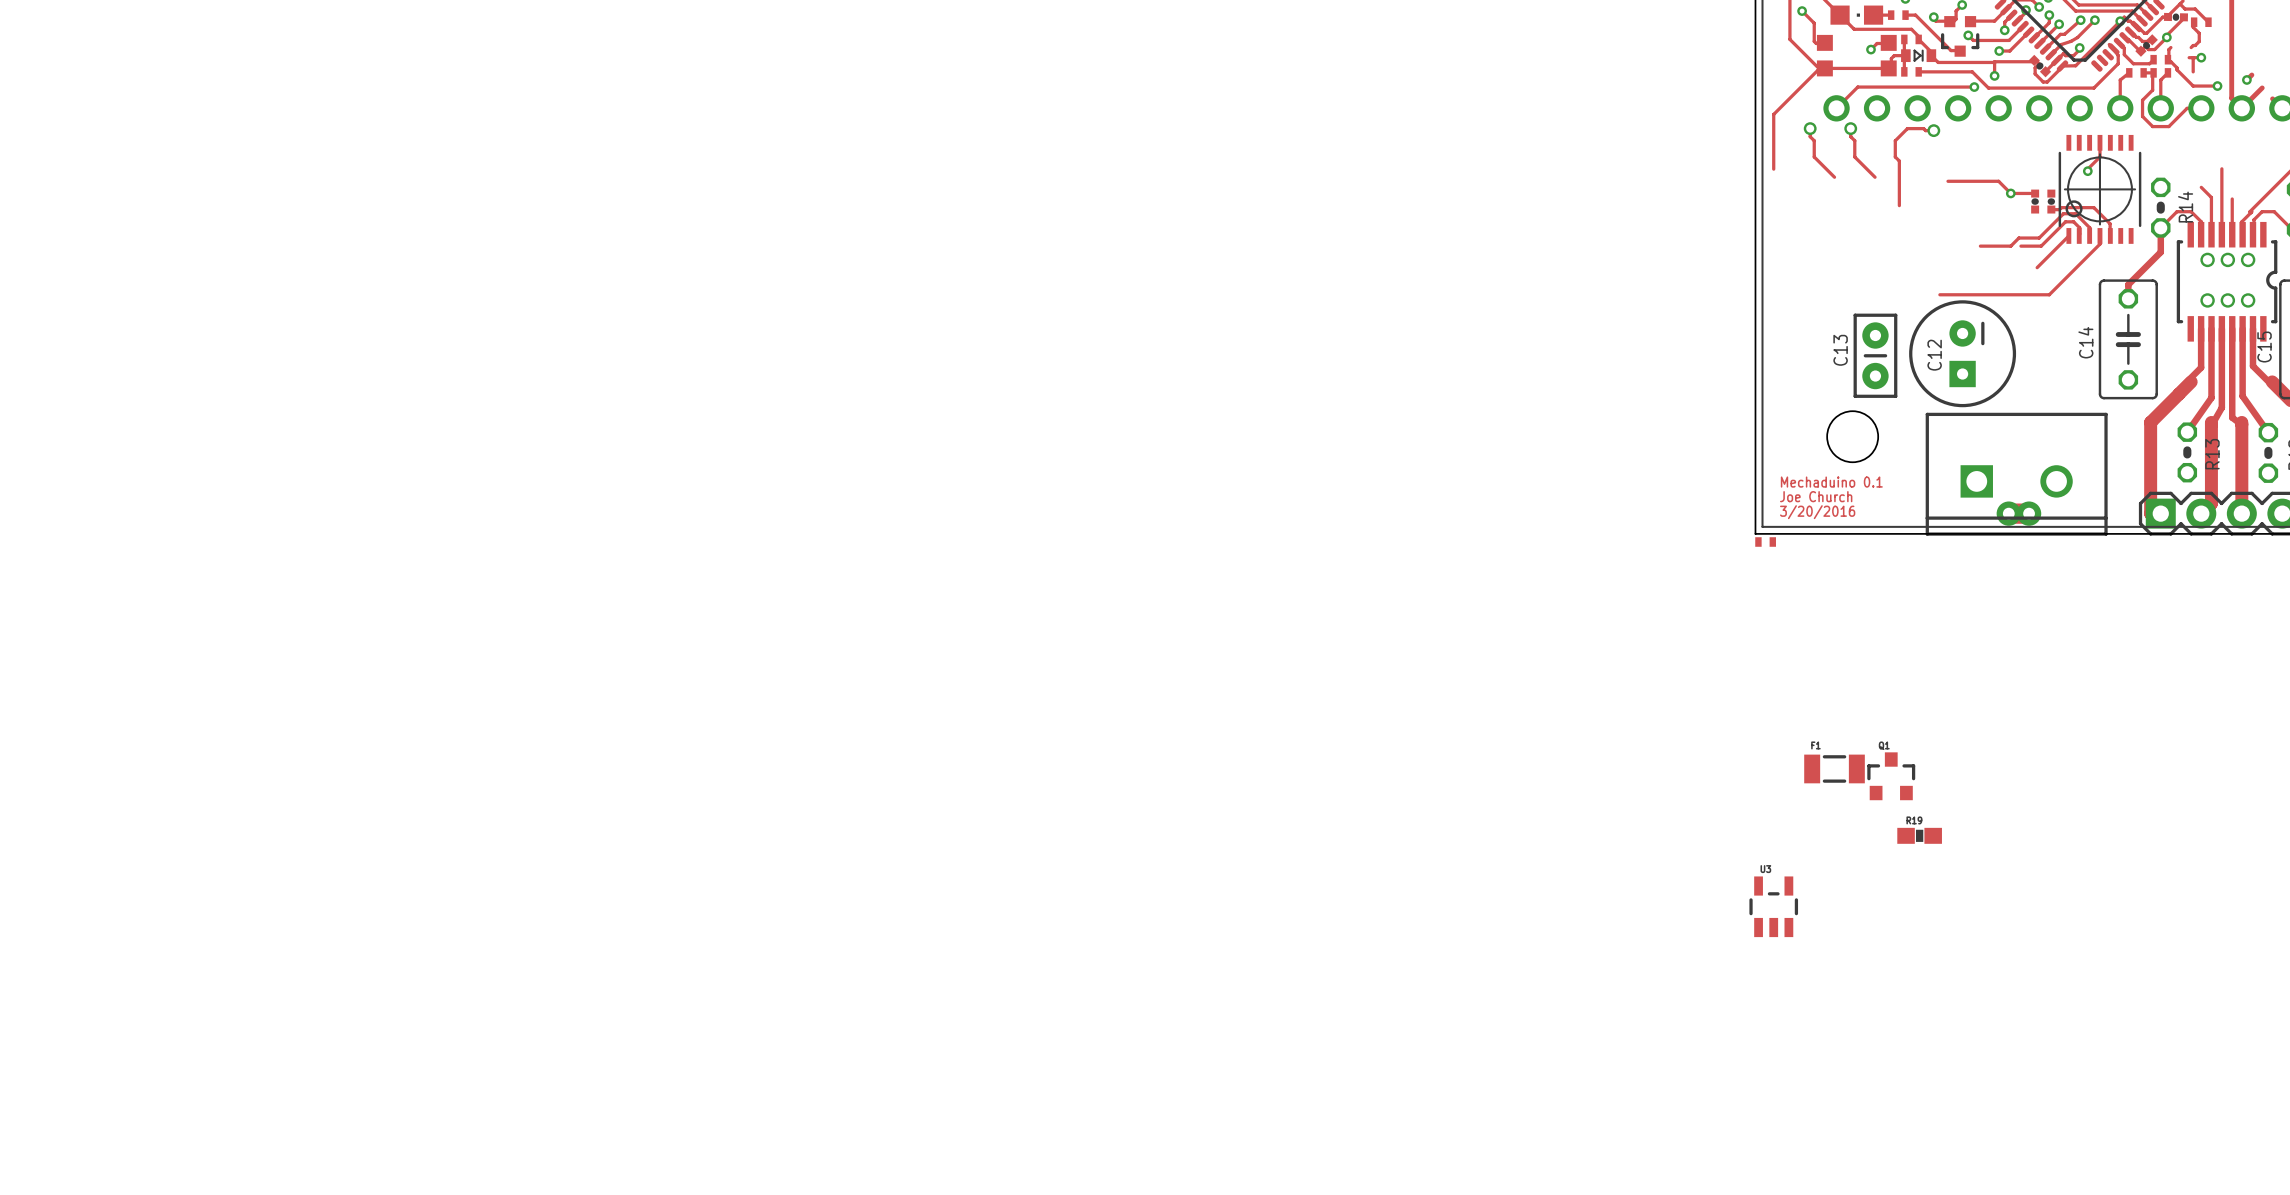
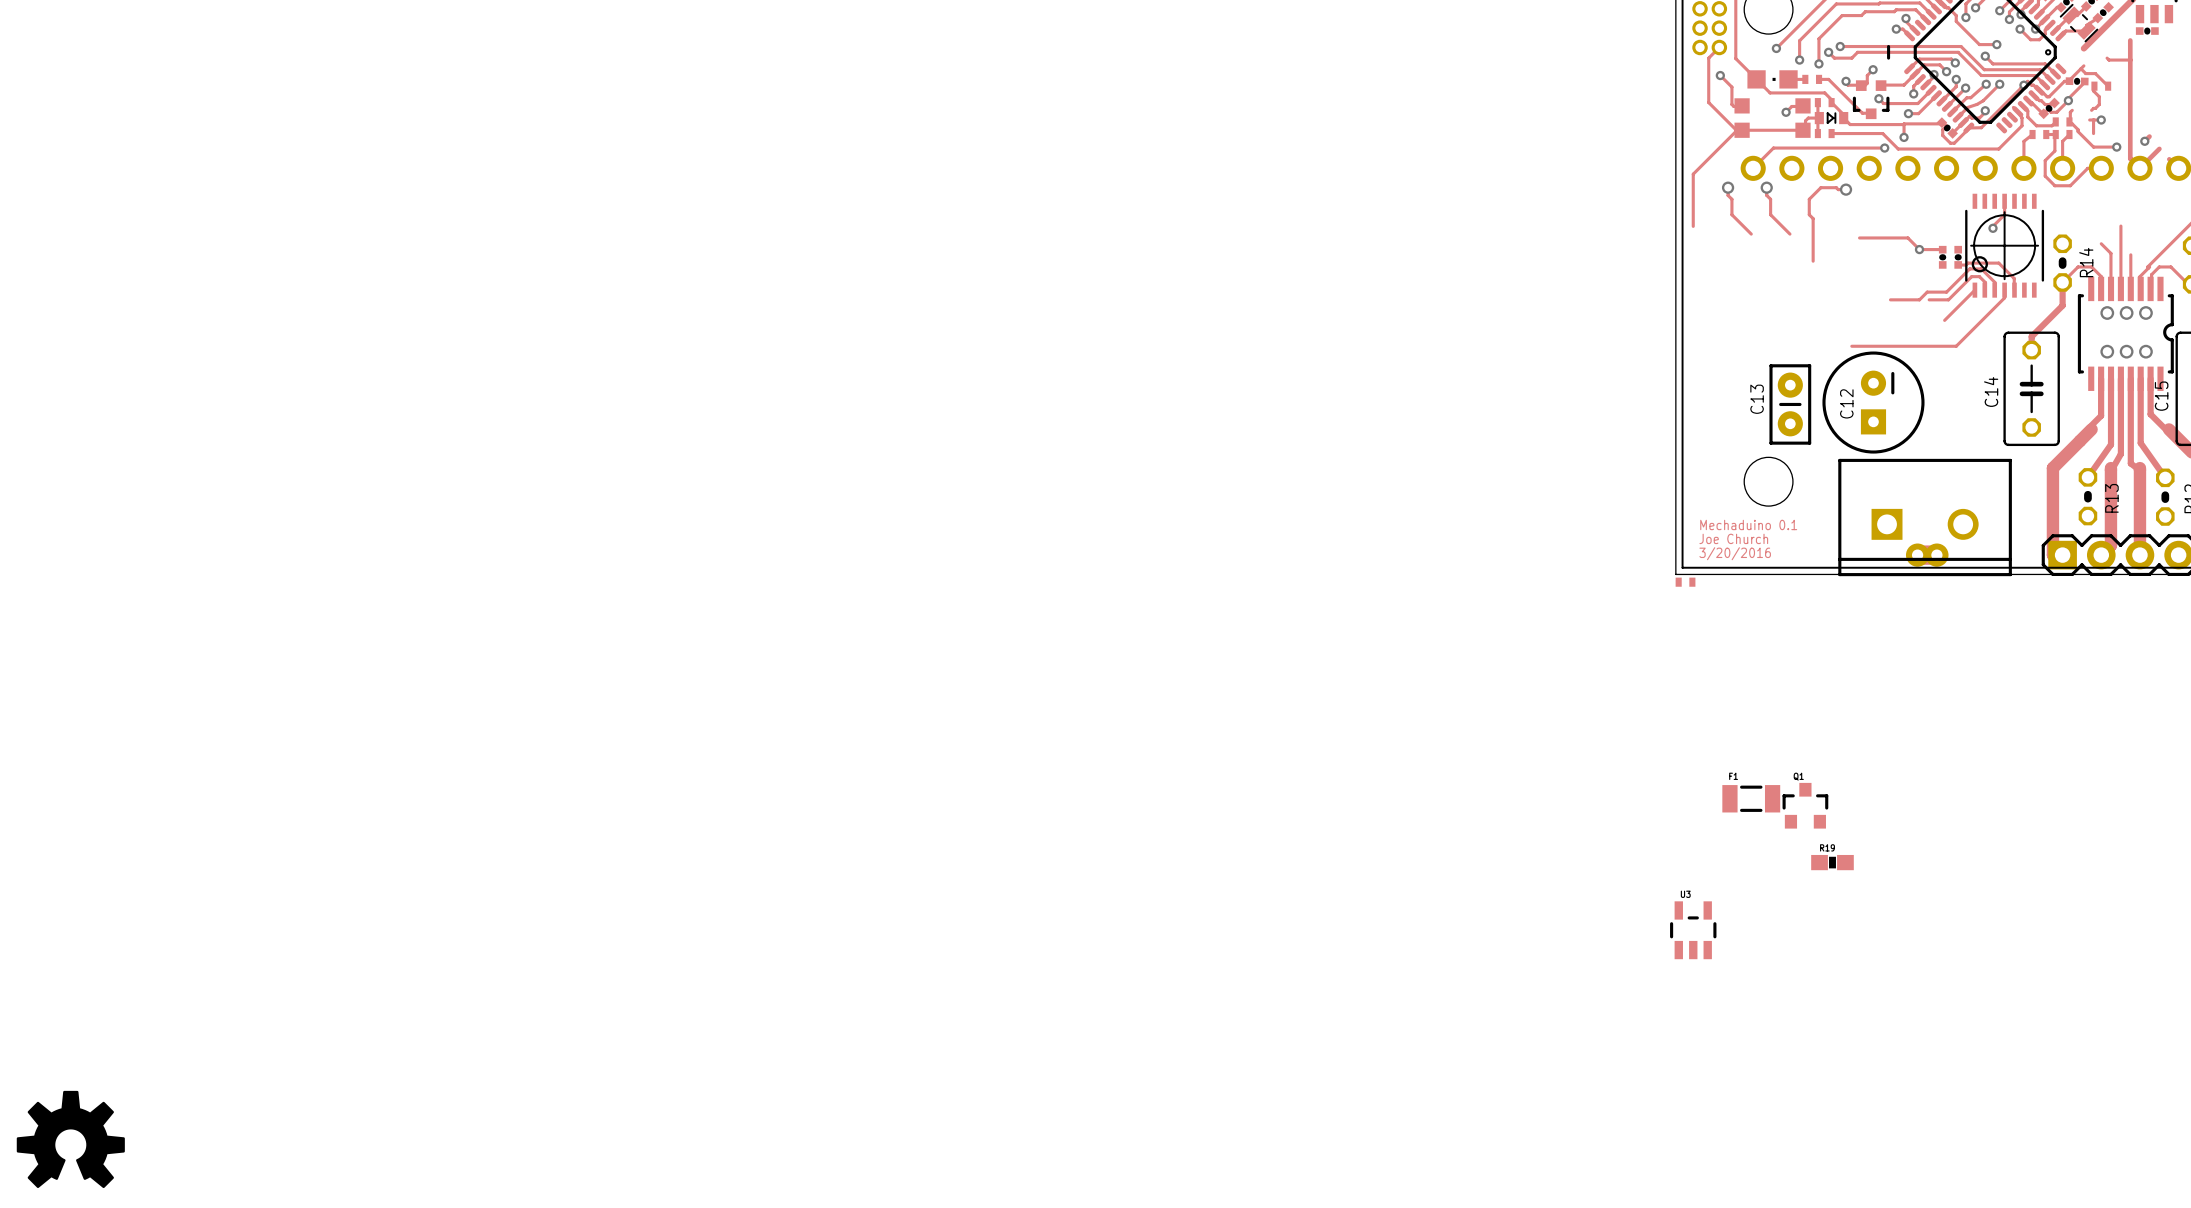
drawing: none -> [16, 1090, 125, 1189]

